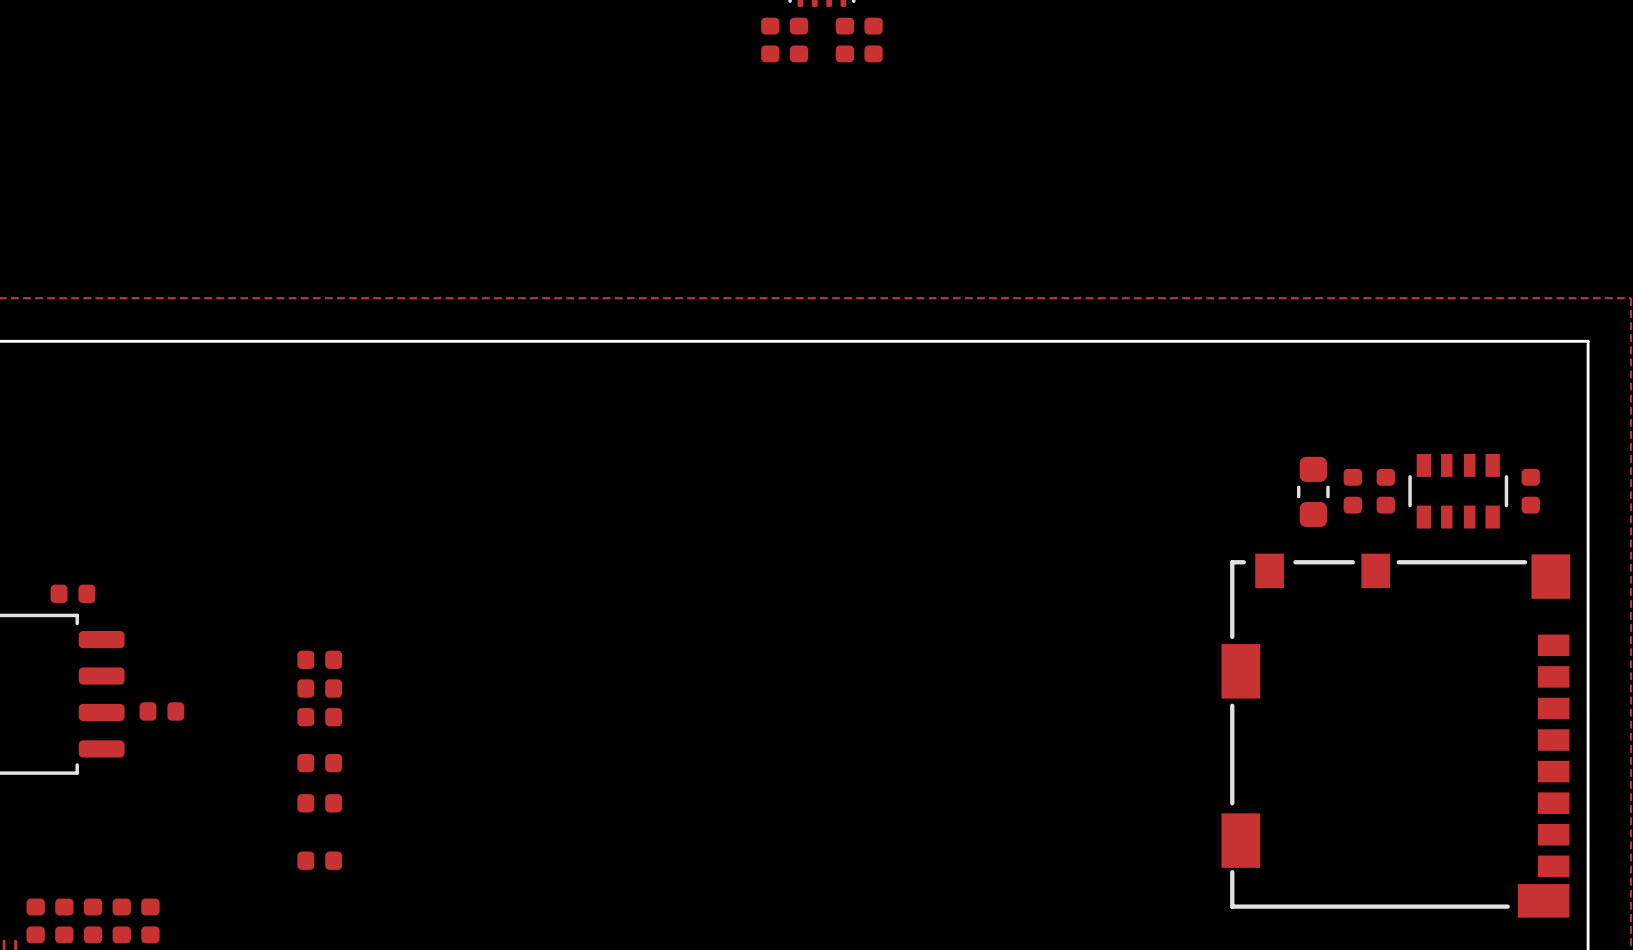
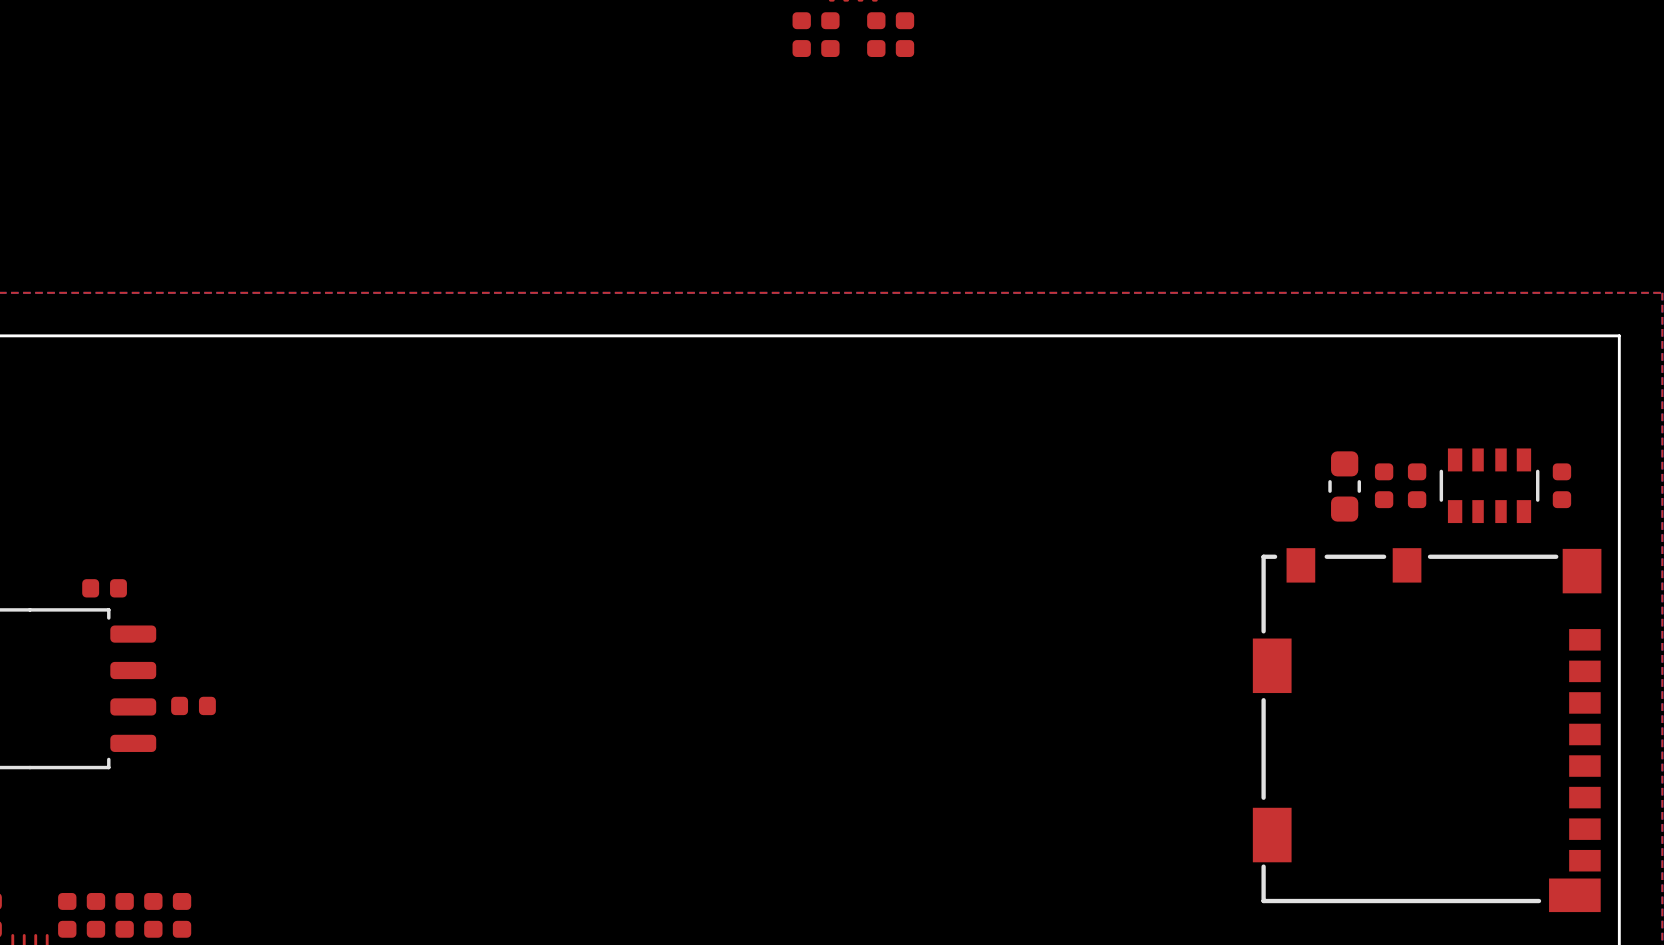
part: (319, 659) -> none
part: (319, 688) -> none
part: (319, 717) -> none
part: (319, 763) -> none
part: (319, 803) -> none
part: (319, 860) -> none

